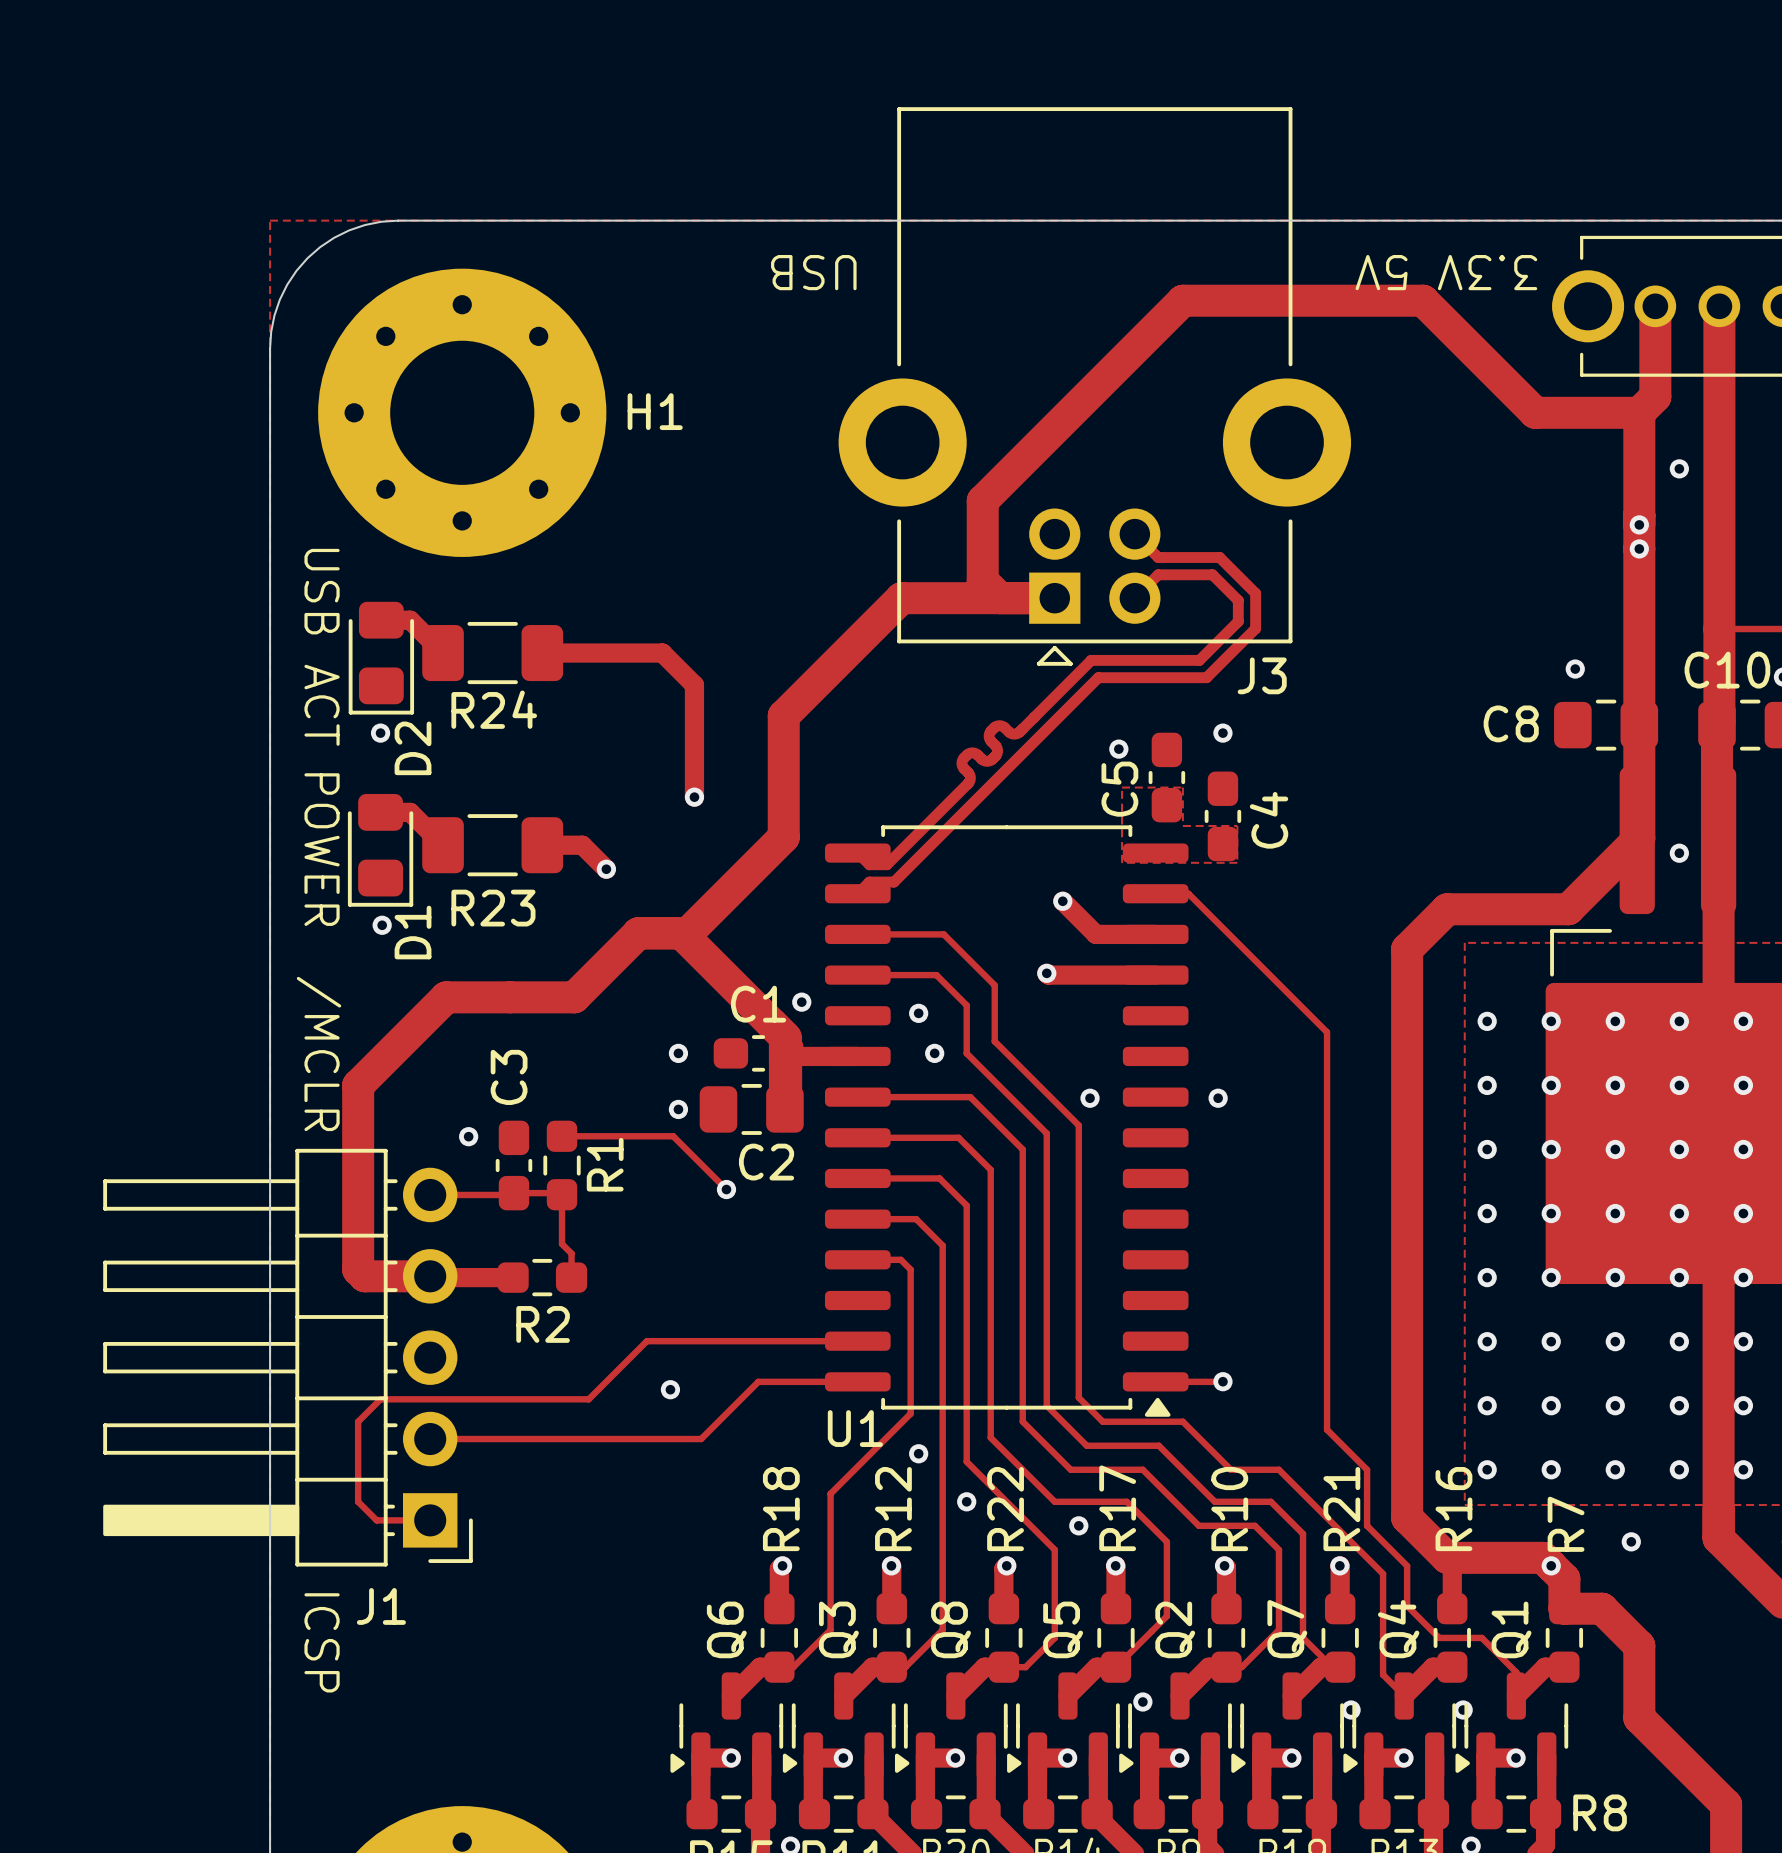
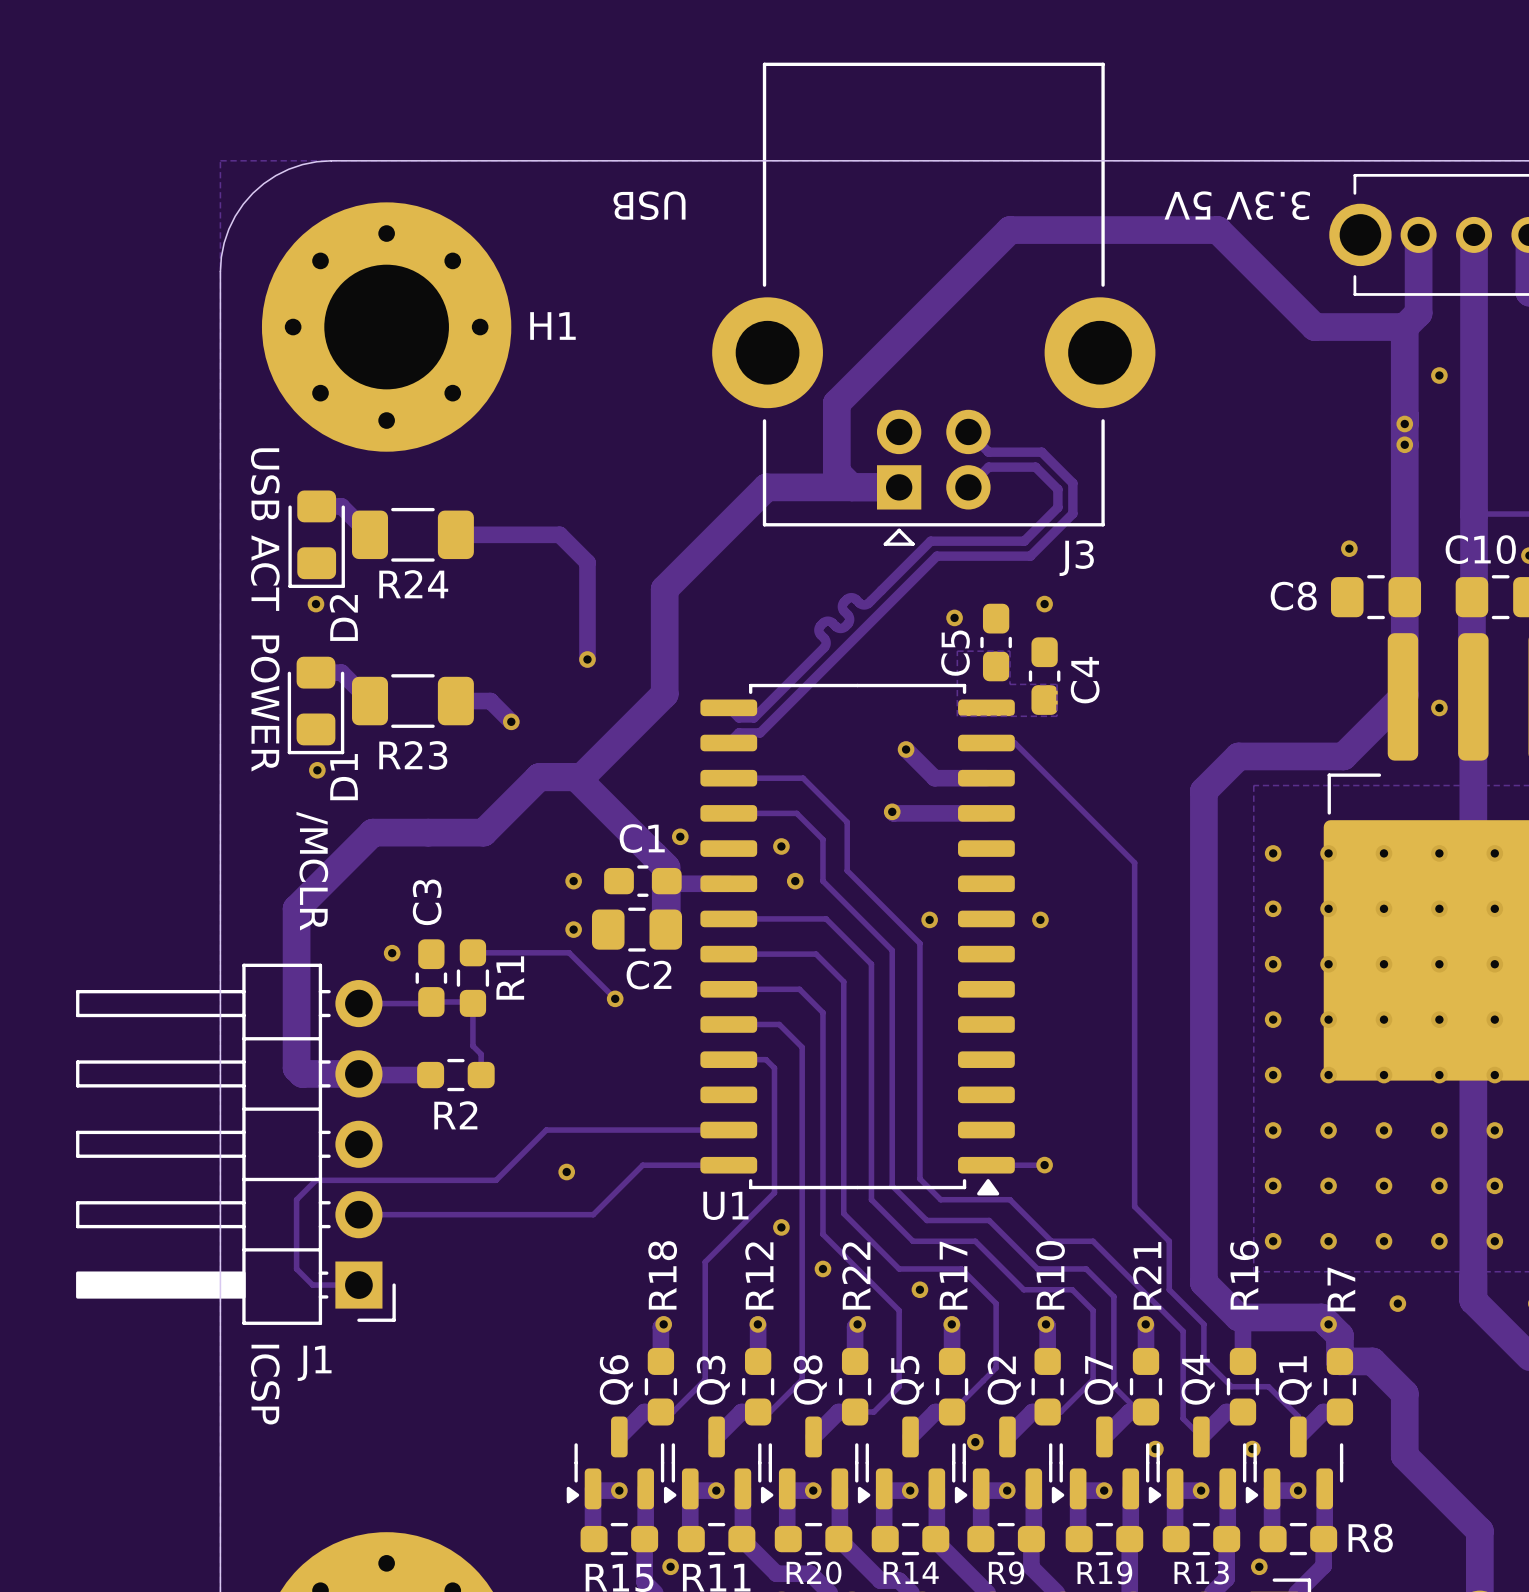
text position: USB (813, 272) -> USB (649, 205)
text position: /MCLR (318, 1053) -> /MCLR (312, 871)

